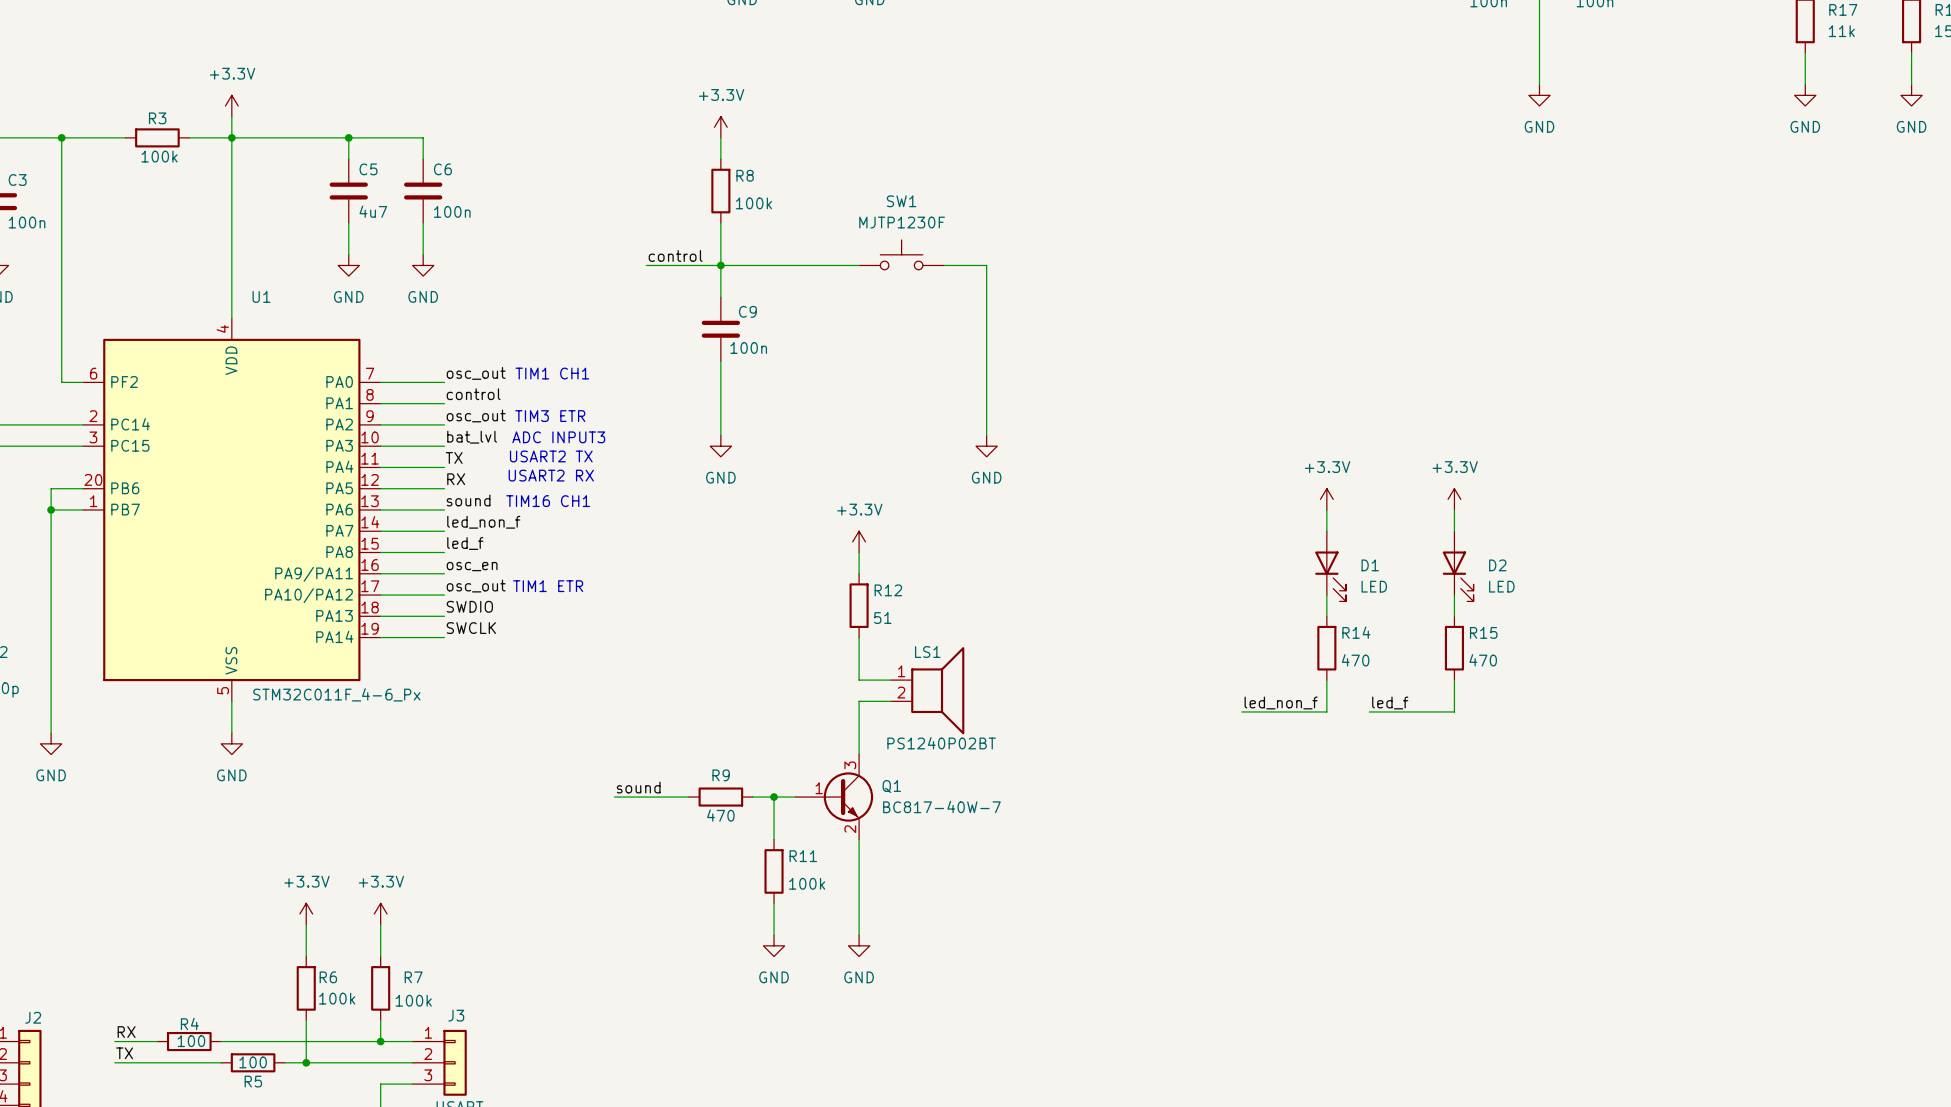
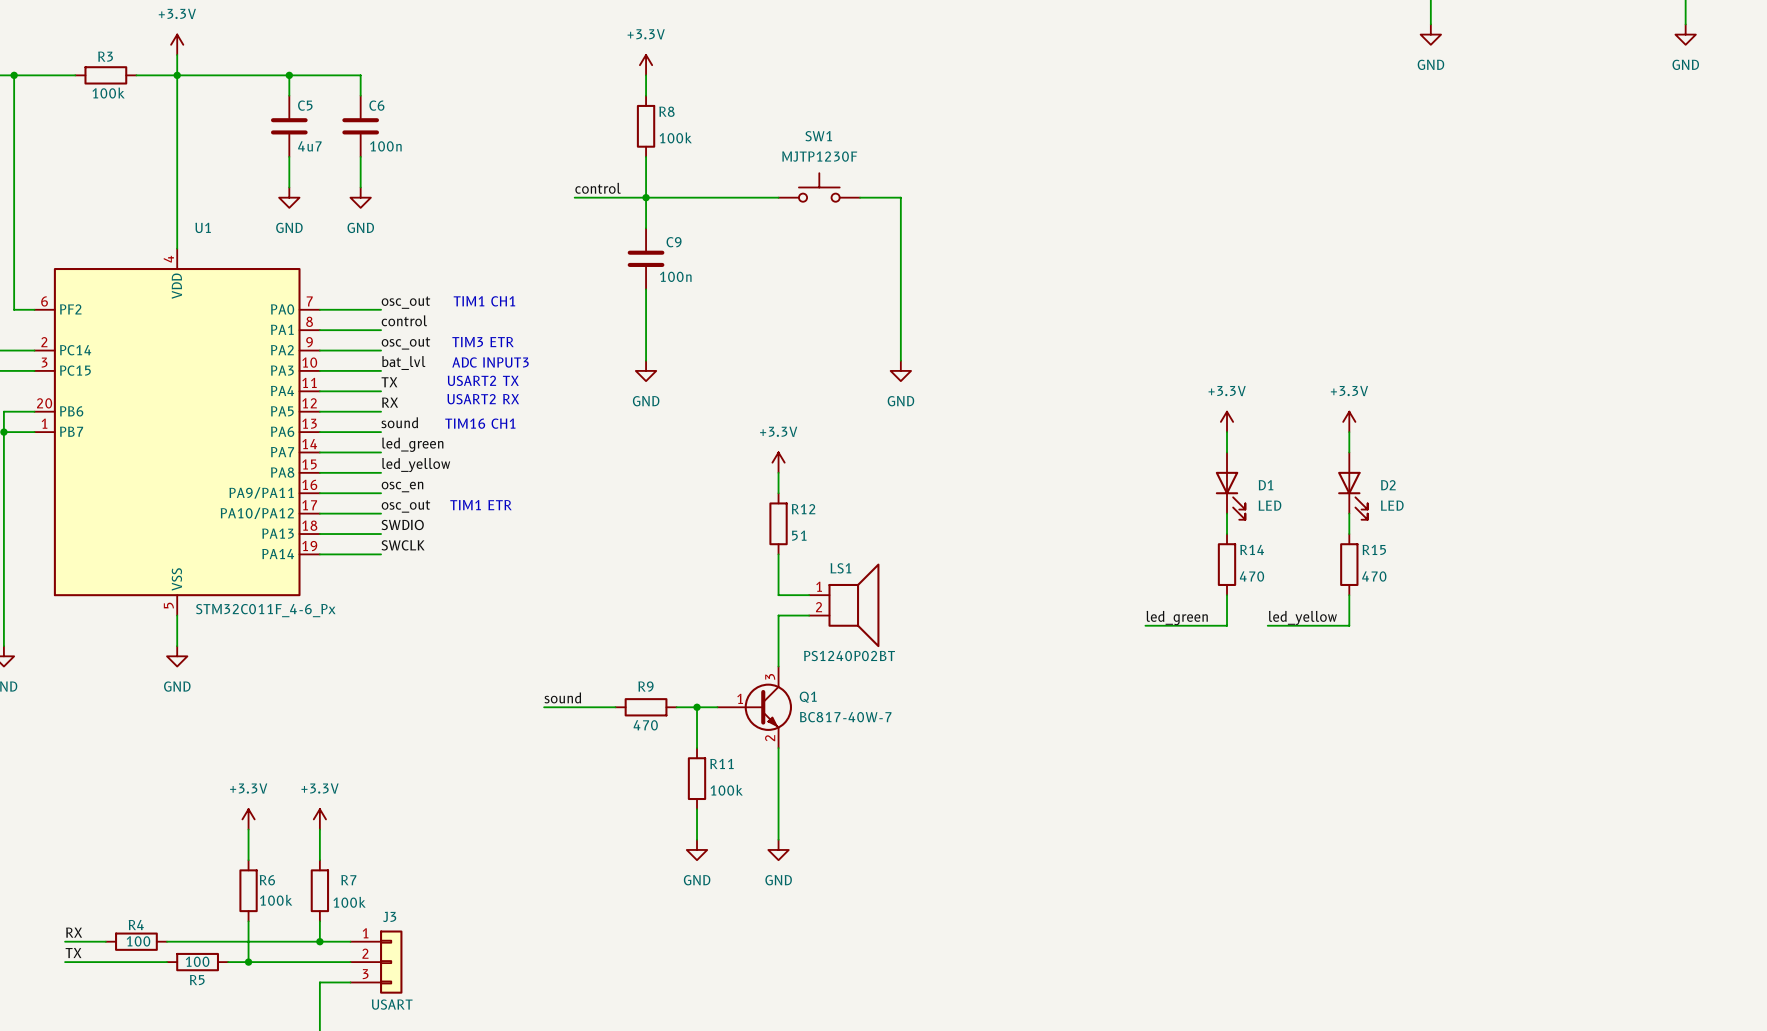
label: led_non_f (483, 522) -> led_green (412, 444)
label: led_f (465, 543) -> led_yellow (416, 465)
label: led_non_f (1281, 702) -> led_green (1177, 618)
label: led_f (1390, 702) -> led_yellow (1302, 617)

